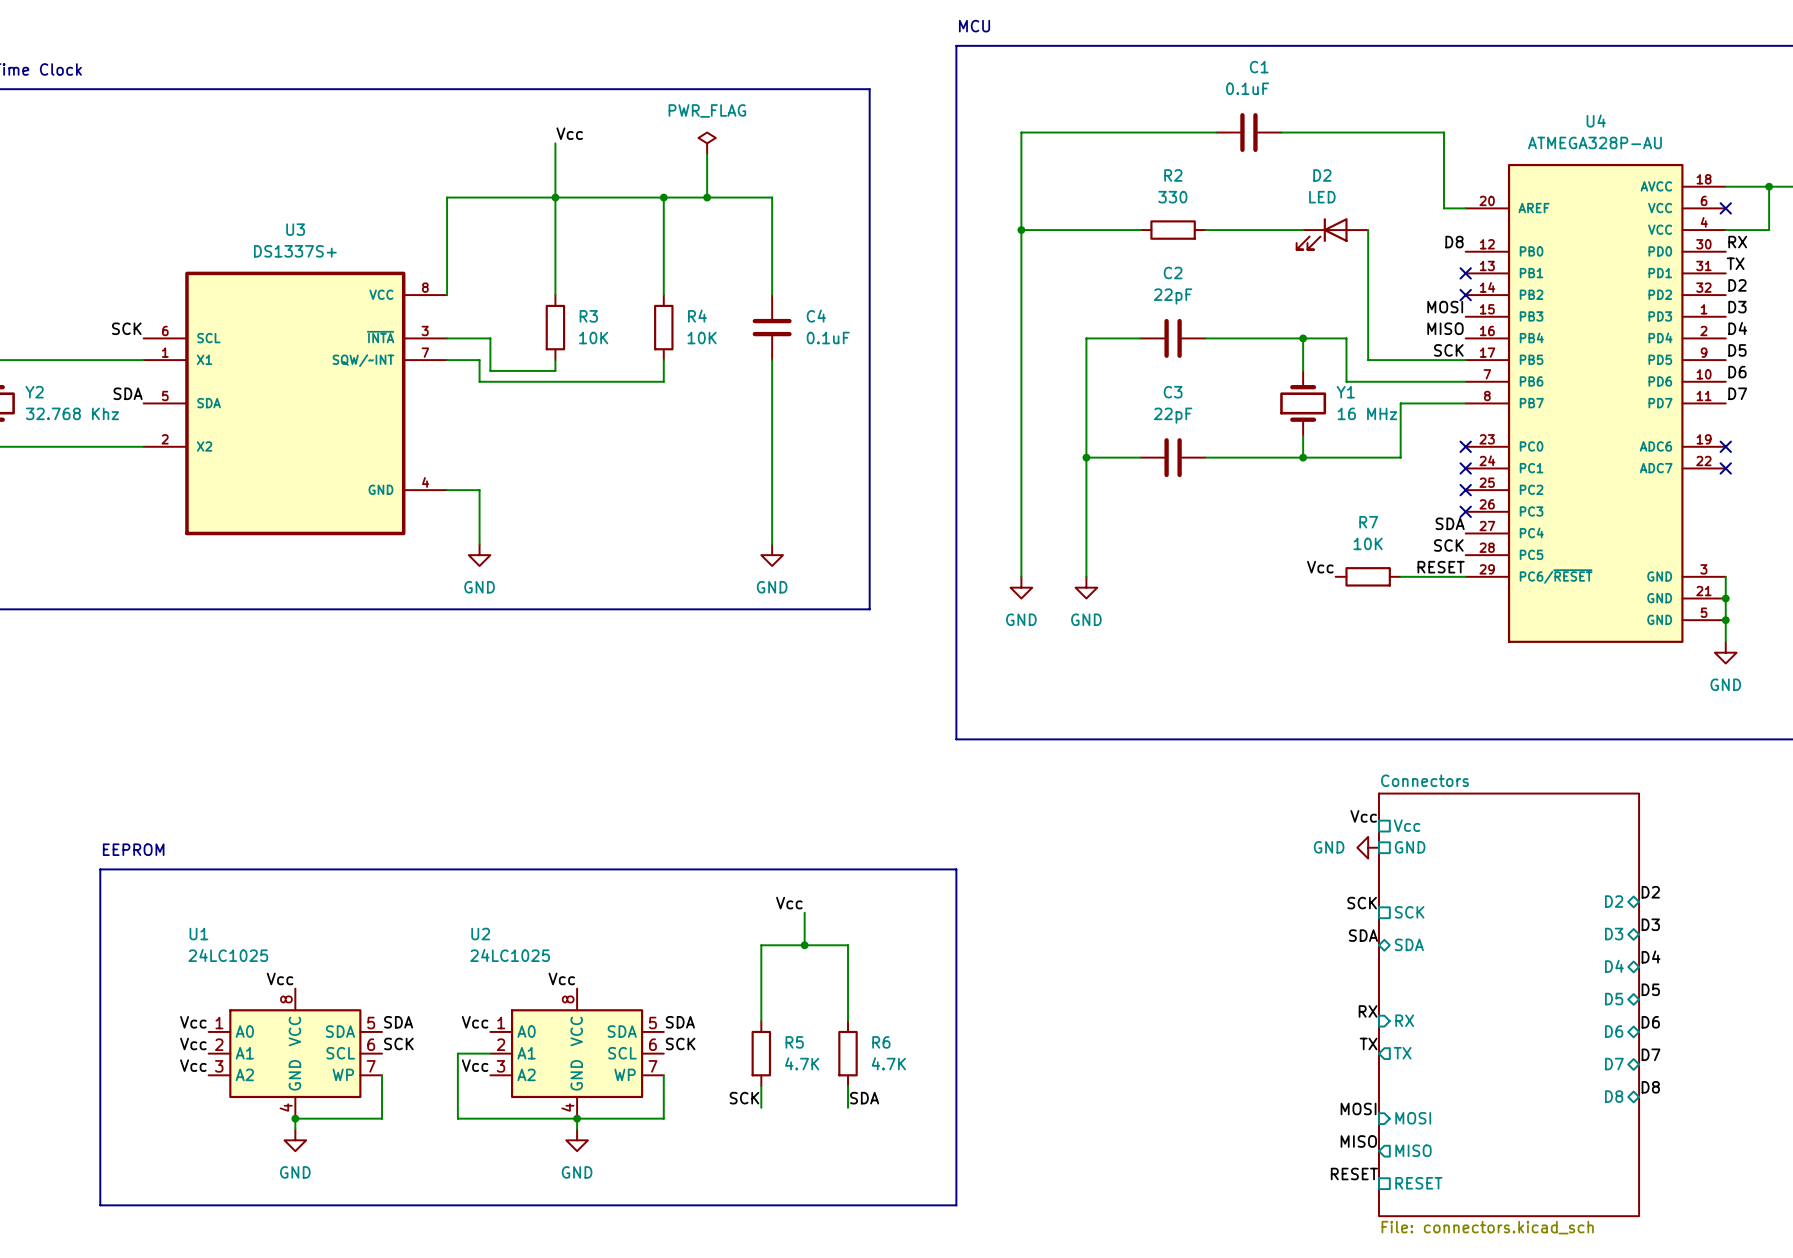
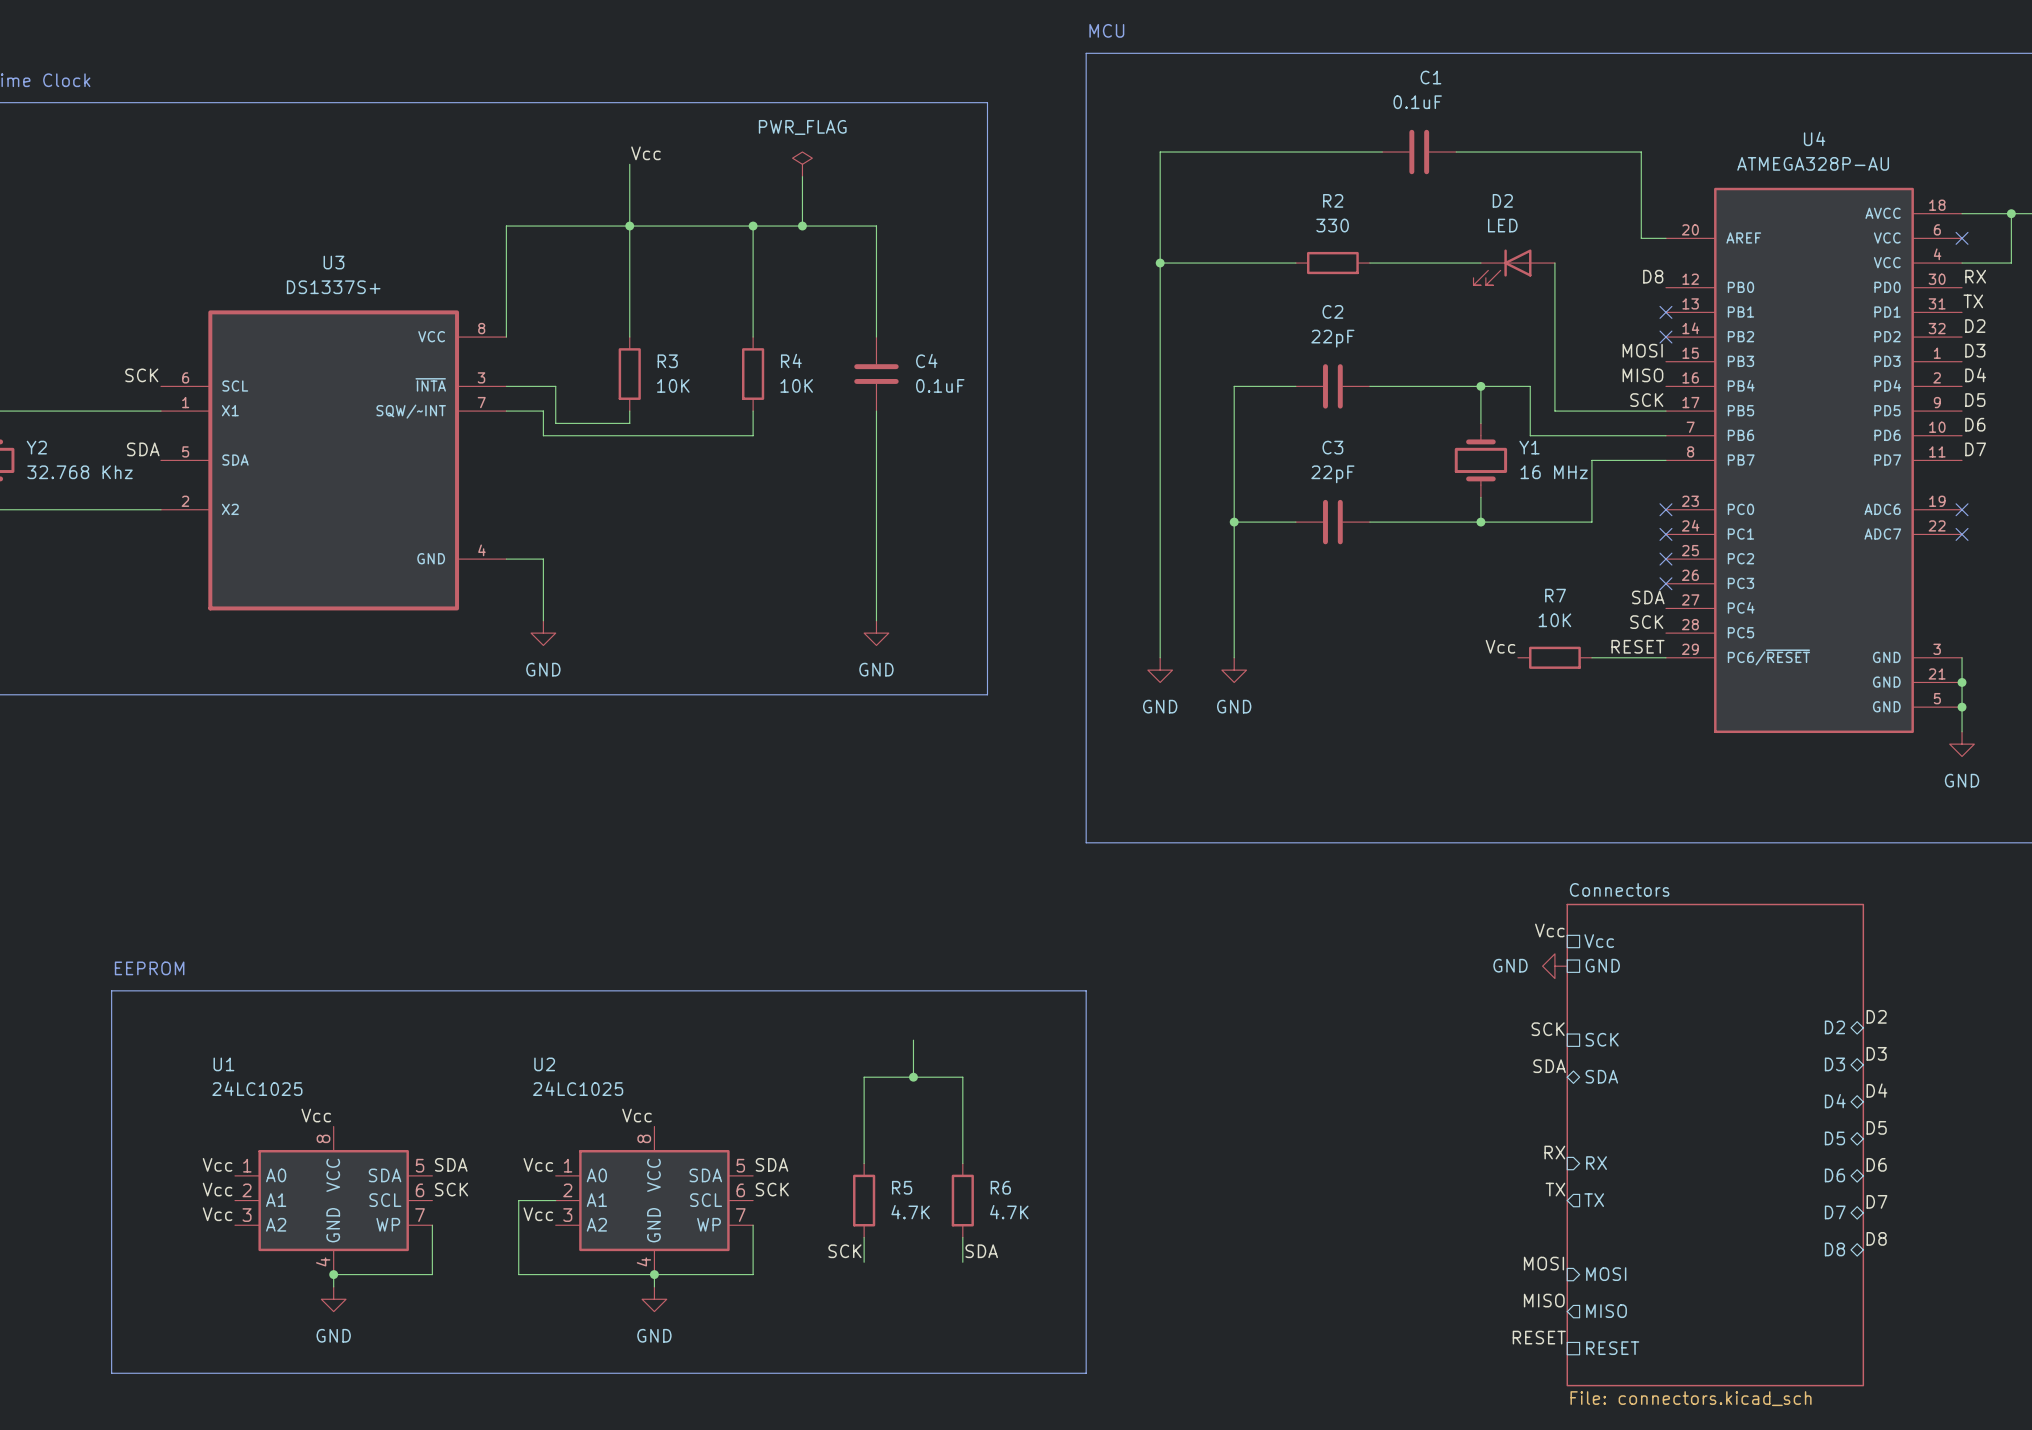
label: Vcc (789, 903) -> none

